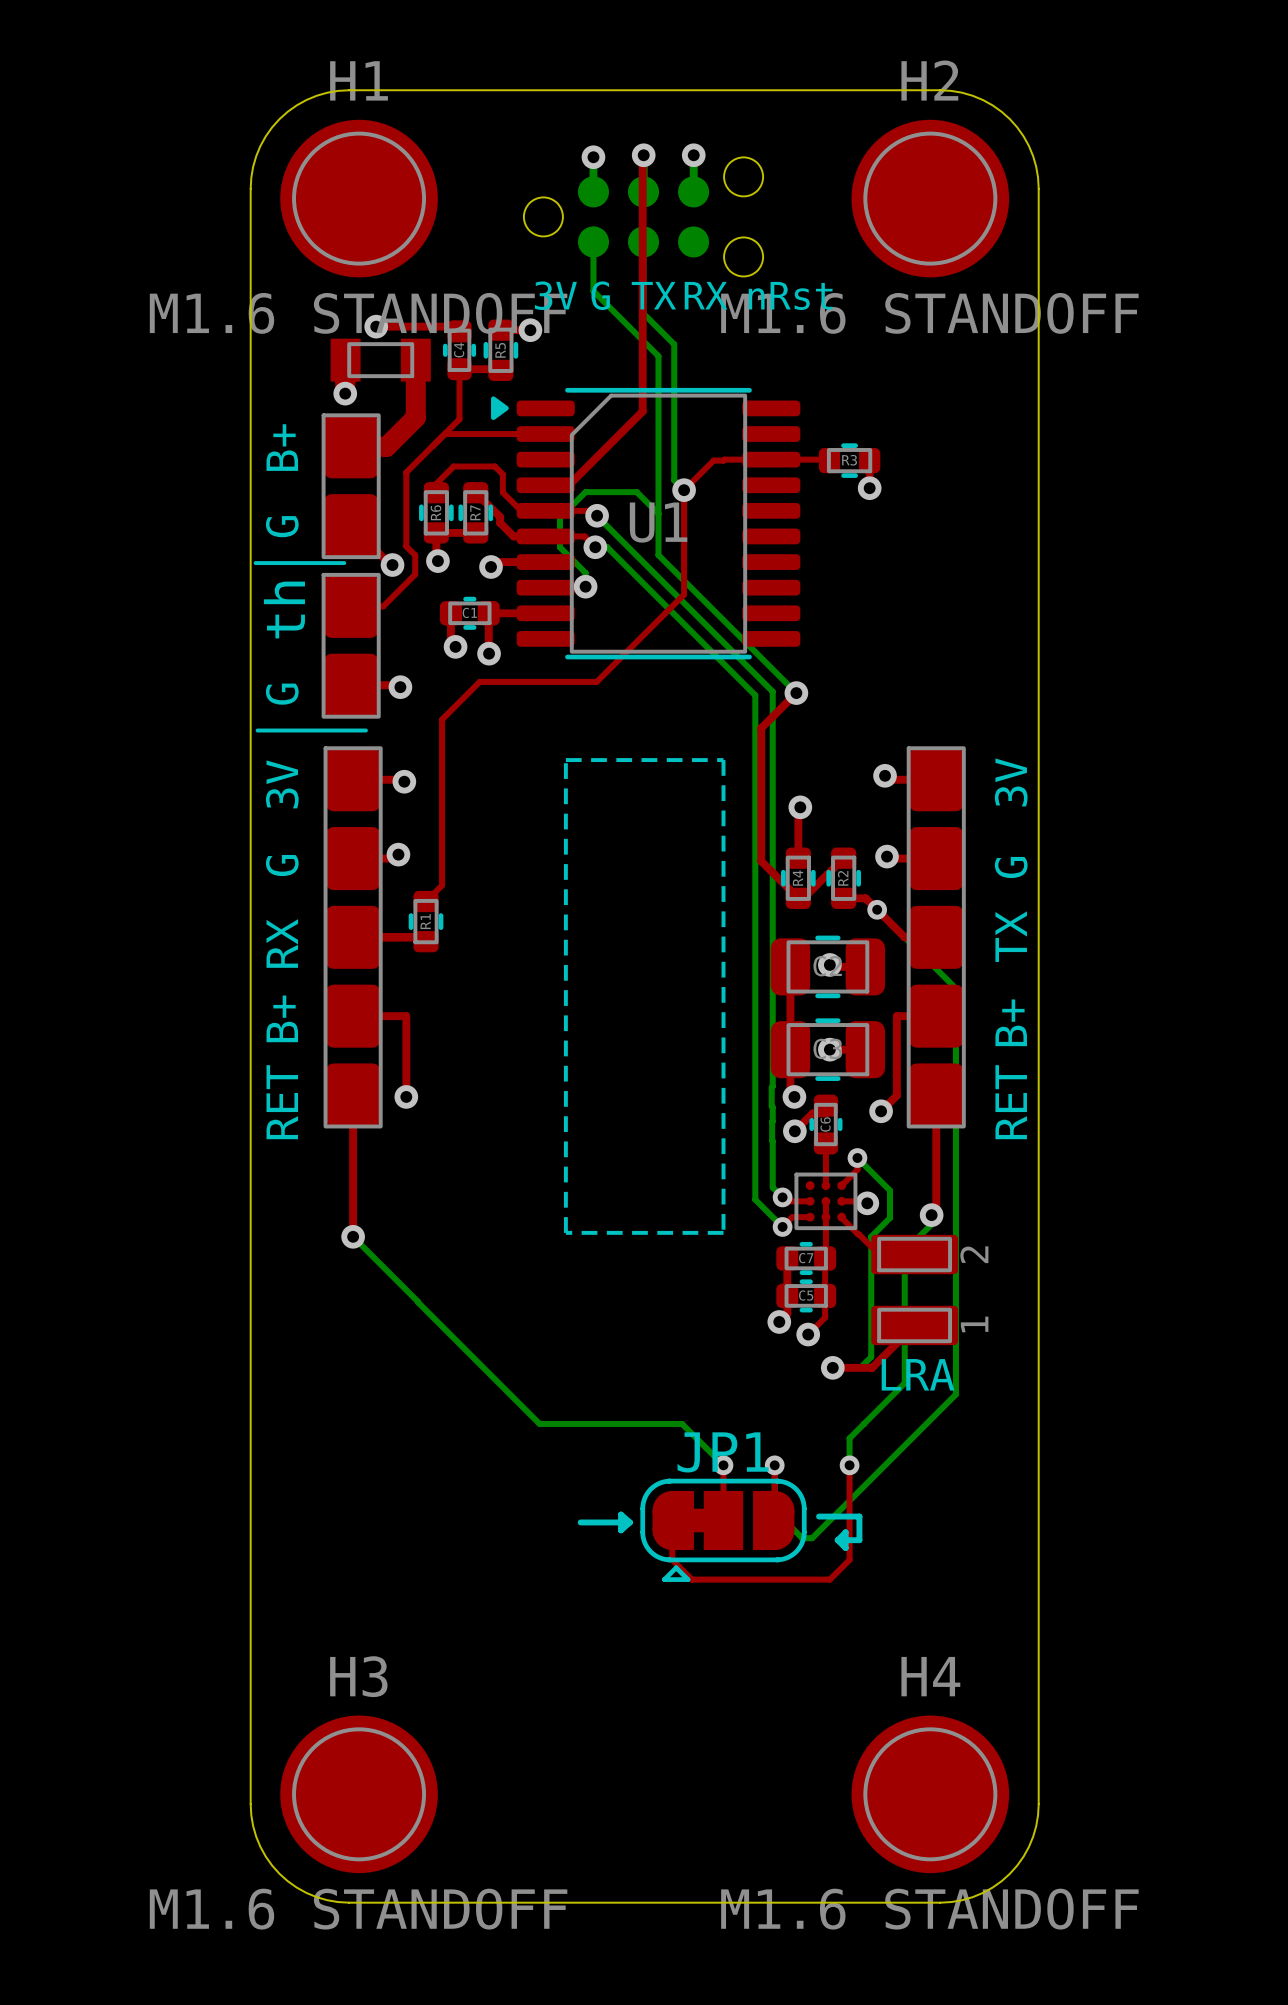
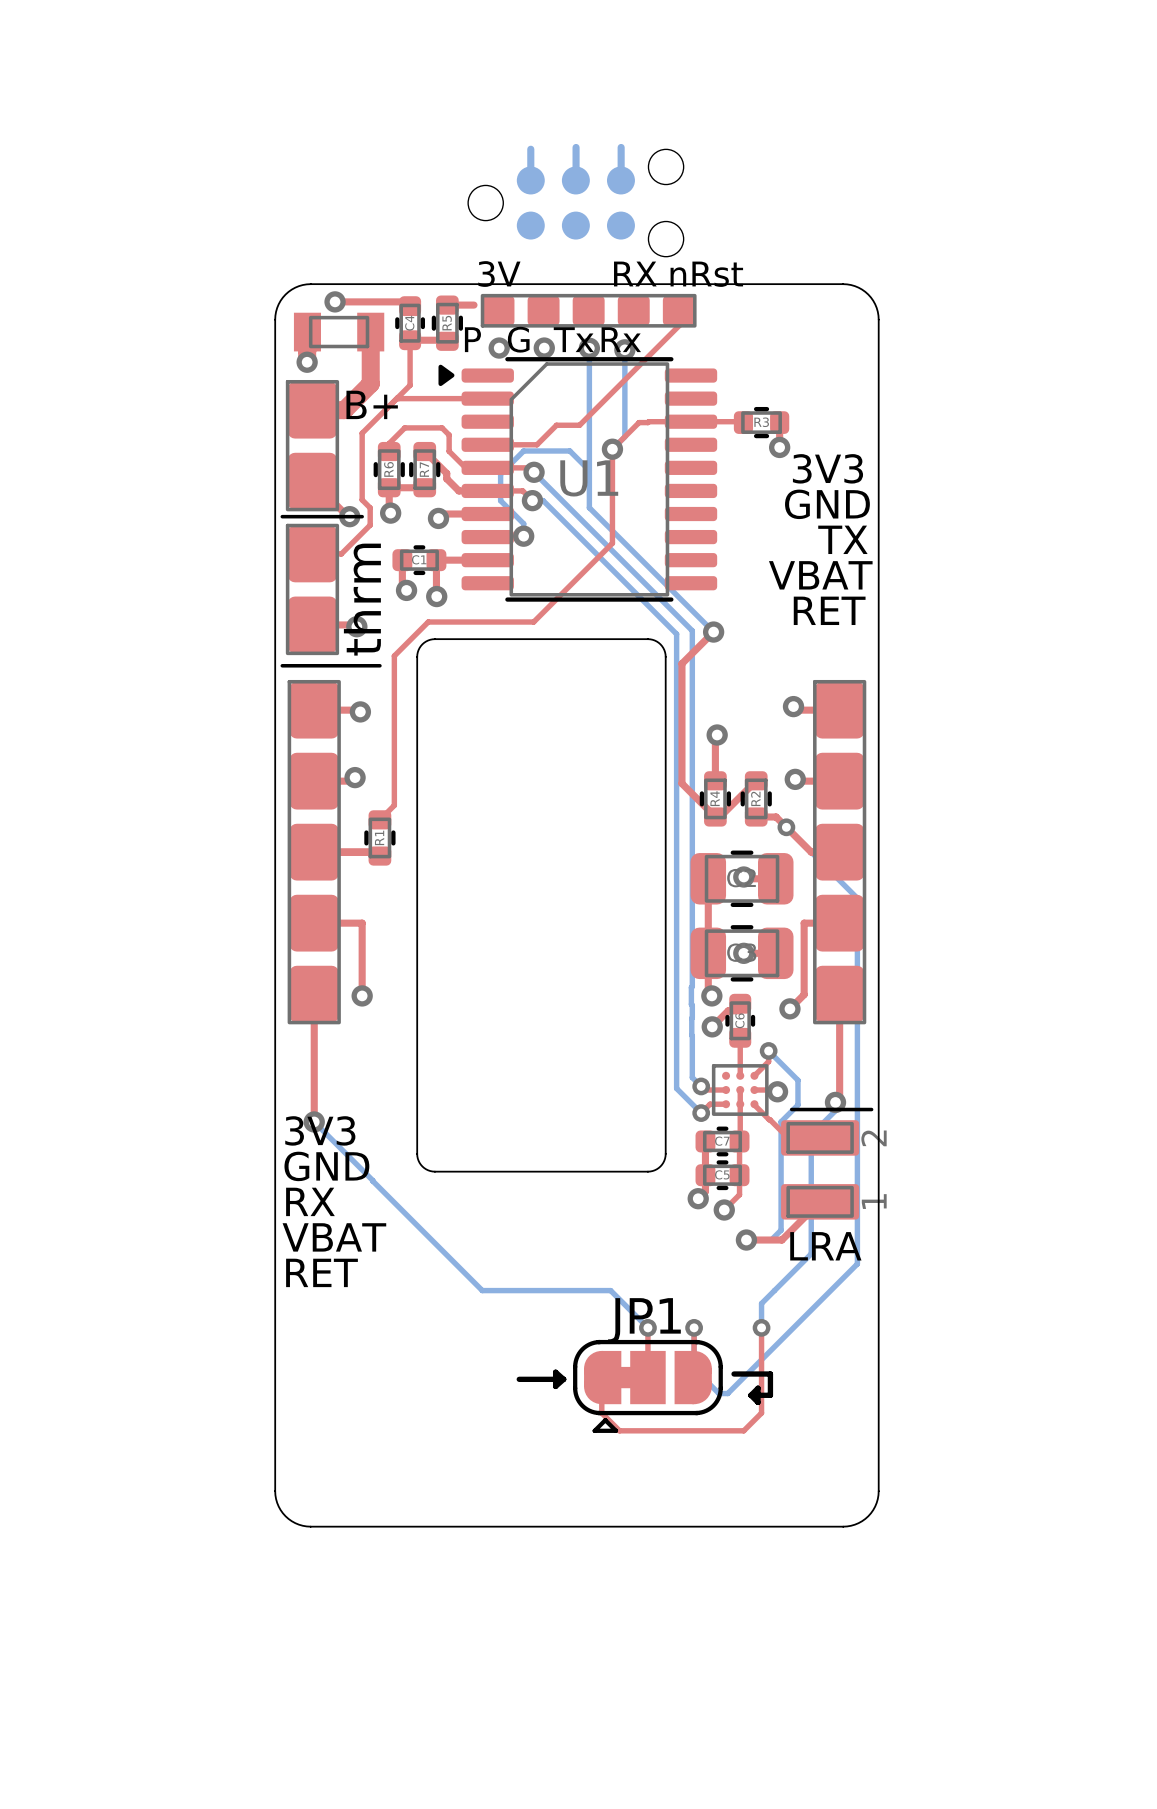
board edge: (349, 90) (951, 90) (972, 95) (1001, 111) (1023, 136) (1033, 156) (1038, 188) (1038, 1804) (1033, 1836) (1017, 1865) (992, 1887) (972, 1897) (940, 1902) (338, 1902) (306, 1892) (287, 1881) (272, 1865) (256, 1836) (250, 1804) (250, 188) (256, 156) (265, 136) (279, 119) (296, 105) (316, 95) (349, 90) -> (310, 284) (298, 286) (285, 294) (277, 307) (275, 319) (275, 1491) (278, 1506) (291, 1521) (310, 1526) (843, 1526) (858, 1523) (873, 1510) (878, 1491) (878, 319) (875, 304) (862, 289) (843, 284) (310, 284)
top track: (643, 155) (642, 411) (568, 485) -> none
via: (643, 155) -> none
via: (693, 155) -> none
via: (593, 157) -> none
H1: M1.6 STANDOFF (359, 198) -> none
H2: M1.6 STANDOFF (930, 198) -> none
bottom track: (593, 241) (593, 291) (658, 356) (658, 378) -> none
bottom track: (643, 241) (643, 313) (674, 344) (674, 480) (684, 490) -> (624, 349) (624, 436) (612, 449)
text position: G (600, 295) -> G (518, 339)
text: TX (653, 295) -> none
via: (530, 330) -> none
part: none -> (588, 310)
top track: none -> (679, 314) (679, 325) (579, 425) (556, 425) (537, 444) (487, 444)
text: none -> P (472, 339)
text: none -> Tx (573, 339)
text: none -> Rx (621, 339)
via: none -> (499, 348)
via: none -> (544, 348)
via: none -> (589, 348)
via: none -> (624, 349)
text rotation: 0° (282, 447) -> 90° clockwise (372, 404)
text position: B+ (282, 447) -> B+ (372, 404)
text: none -> 3V3 (827, 468)
text: G (282, 526) -> none
text: none -> GND (827, 504)
line: (255, 563) (344, 563) -> (282, 516) (362, 516)
text: none -> TX (842, 539)
text: th (284, 610) -> none
text: none -> VBAT (820, 575)
text: none -> thrm (362, 599)
text: none -> RET (829, 610)
text: G (282, 694) -> none
board edge: none -> (434, 639) (647, 639) (658, 642) (664, 650) (665, 1153) (662, 1164) (654, 1170) (434, 1171) (424, 1167) (418, 1160) (417, 656) (422, 644) (434, 639)
line: (257, 730) (317, 730) -> (325, 665) (379, 665)
line: (565, 760) (723, 760) (723, 1232) (565, 1232) (565, 760) -> none
text: 3V (1011, 782) -> none
text: 3V (282, 784) -> none
text: G (282, 865) -> none
text: G (1011, 867) -> none
text: TX (1011, 936) -> none
text rotation: 0° (282, 943) -> 90° clockwise (310, 1201)
text position: RX (282, 943) -> RX (310, 1201)
text: B+ (282, 1018) -> none
text: B+ (1011, 1022) -> none
text rotation: 0° (282, 1102) -> 90° clockwise (322, 1272)
text position: RET (282, 1102) -> RET (322, 1272)
text: RET (1011, 1102) -> none
line: none -> (791, 1109) (871, 1109)
text: none -> 3V3 (320, 1130)
text: none -> GND (326, 1166)
text: none -> VBAT (334, 1237)
H3: M1.6 STANDOFF (359, 1794) -> none
H4: M1.6 STANDOFF (930, 1794) -> none

